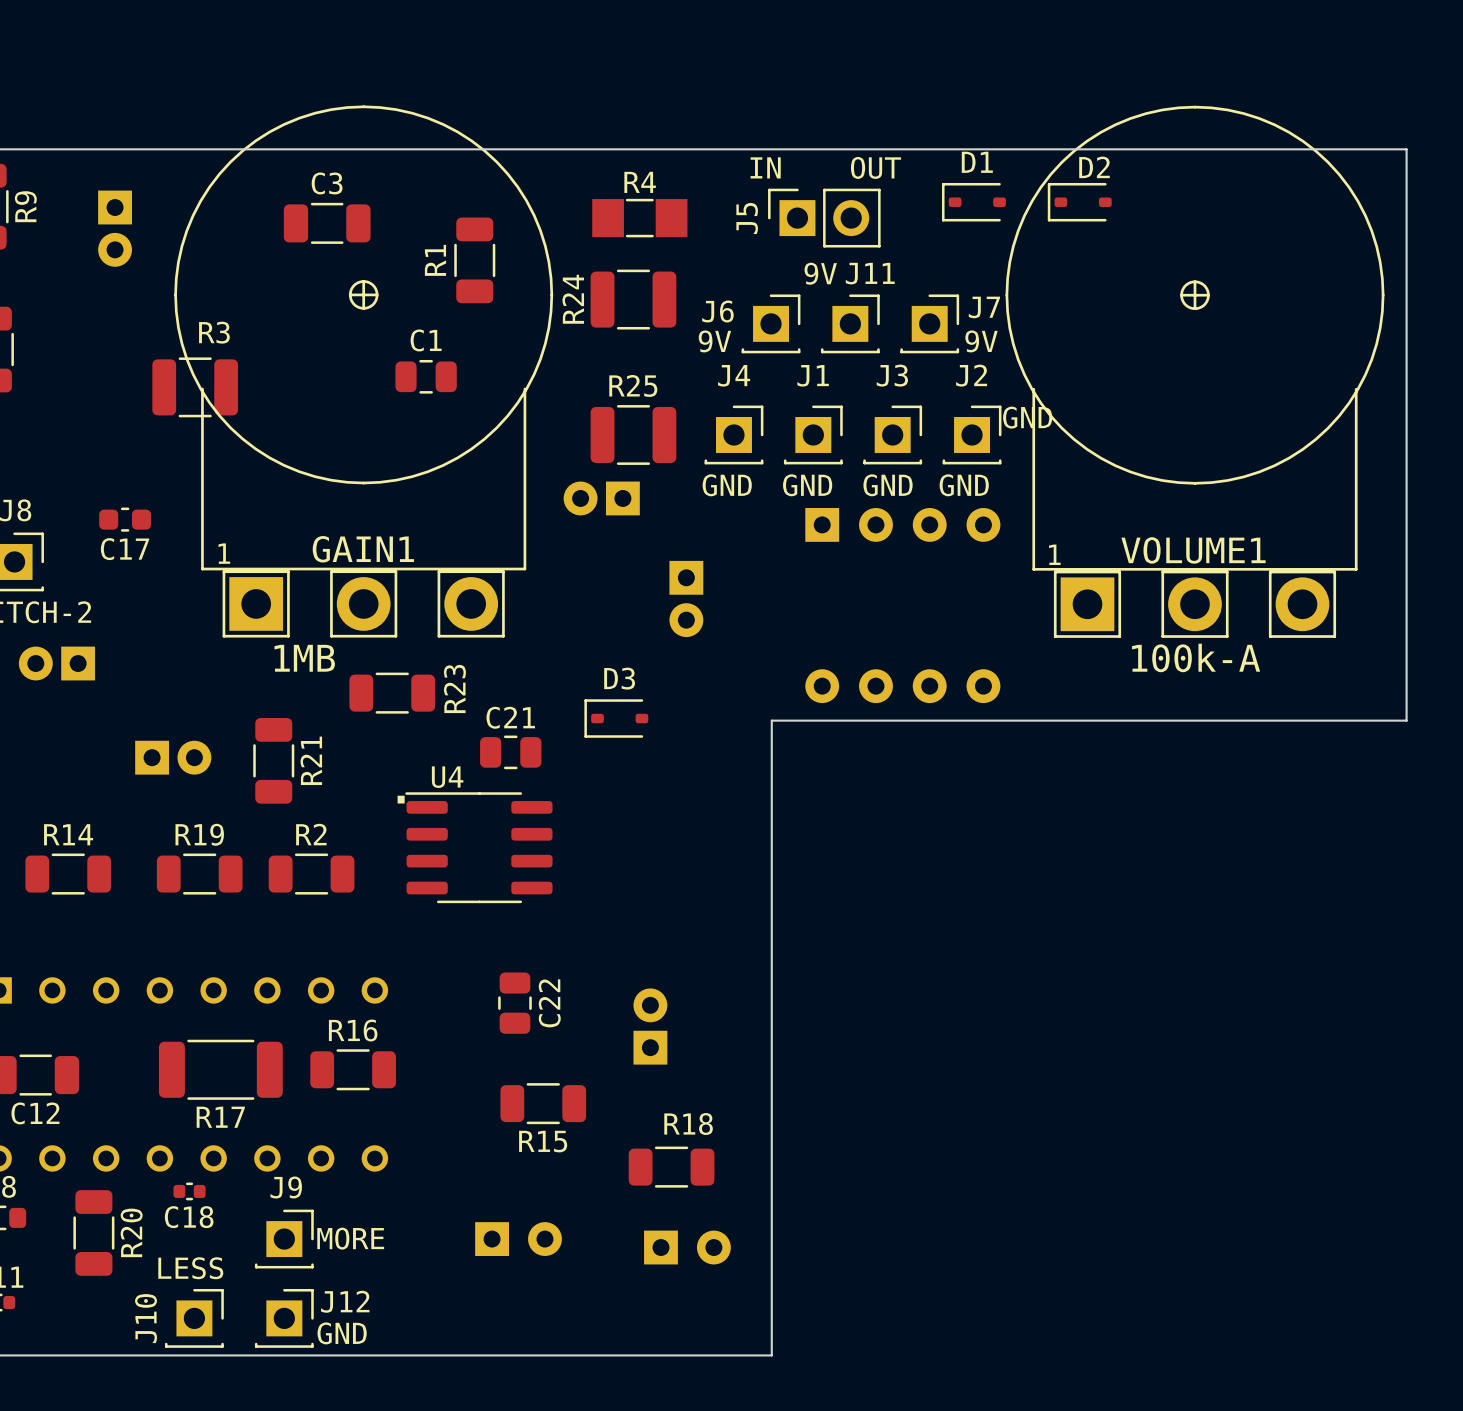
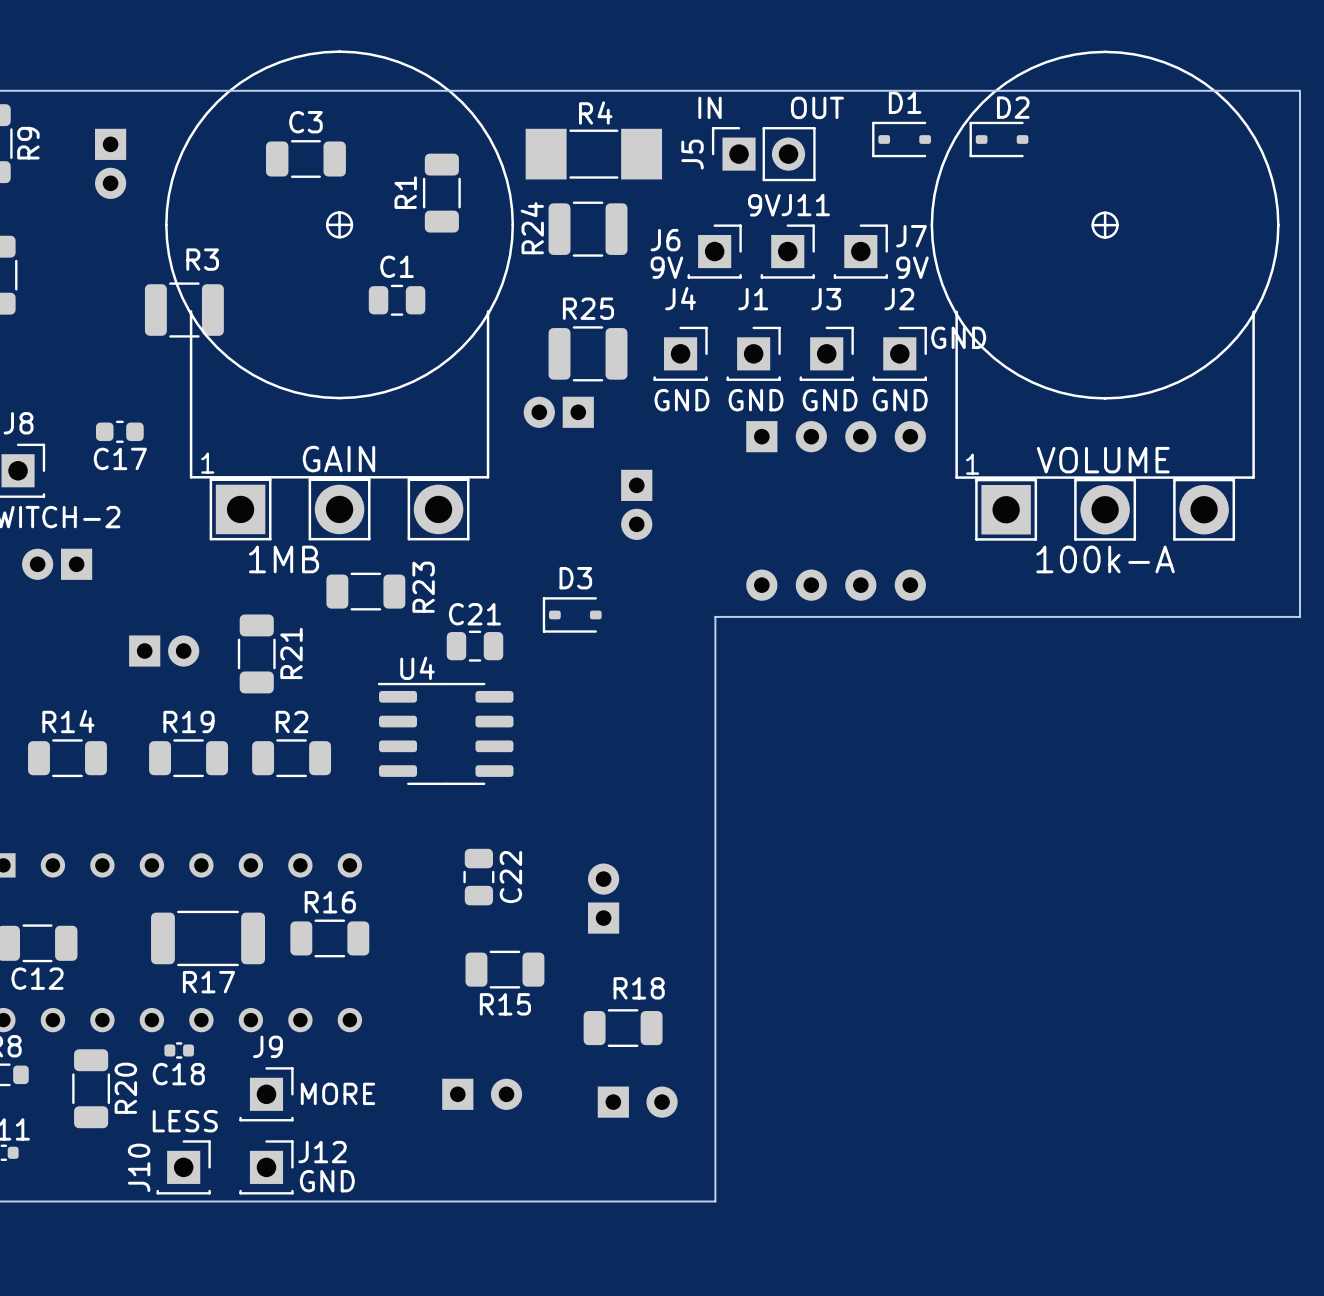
R4 footprint: [592, 198, 688, 238] -> [525, 128, 663, 180]
GAIN1 name: GAIN1 (363, 549) -> GAIN (339, 459)
VOLUME1 name: VOLUME1 (1193, 550) -> VOLUME (1103, 460)
text: . (401, 799) -> none

